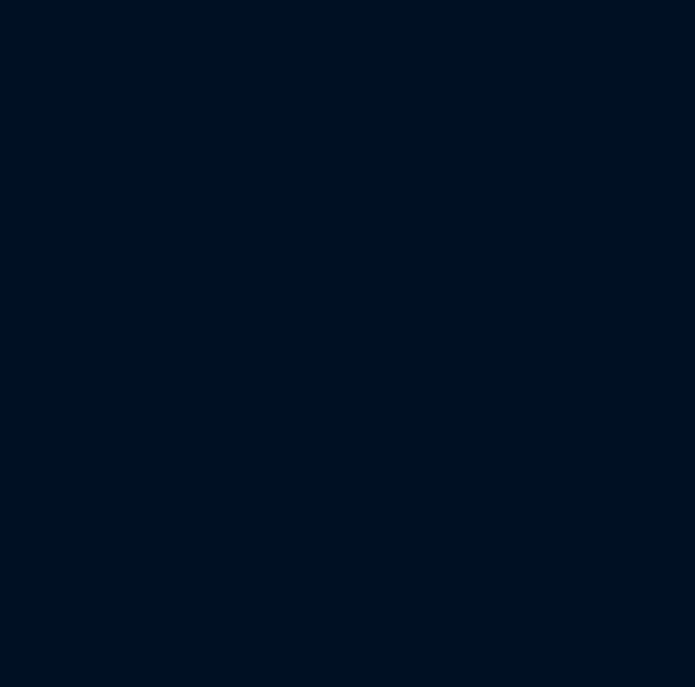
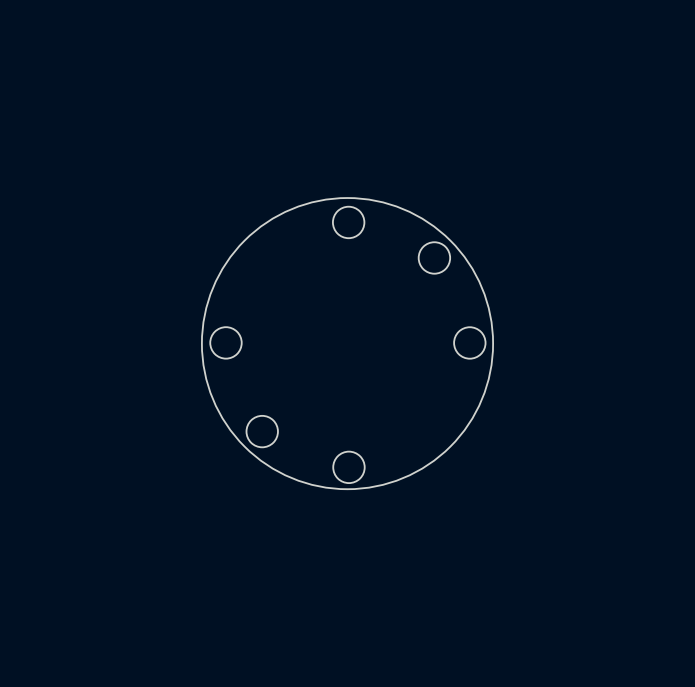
round board edge: none -> [201, 197, 495, 491]
round board edge: none -> [332, 205, 366, 240]
round board edge: none -> [417, 241, 452, 275]
round board edge: none -> [209, 326, 243, 360]
round board edge: none -> [453, 326, 487, 360]
round board edge: none -> [245, 414, 279, 449]
round board edge: none -> [332, 450, 366, 485]

